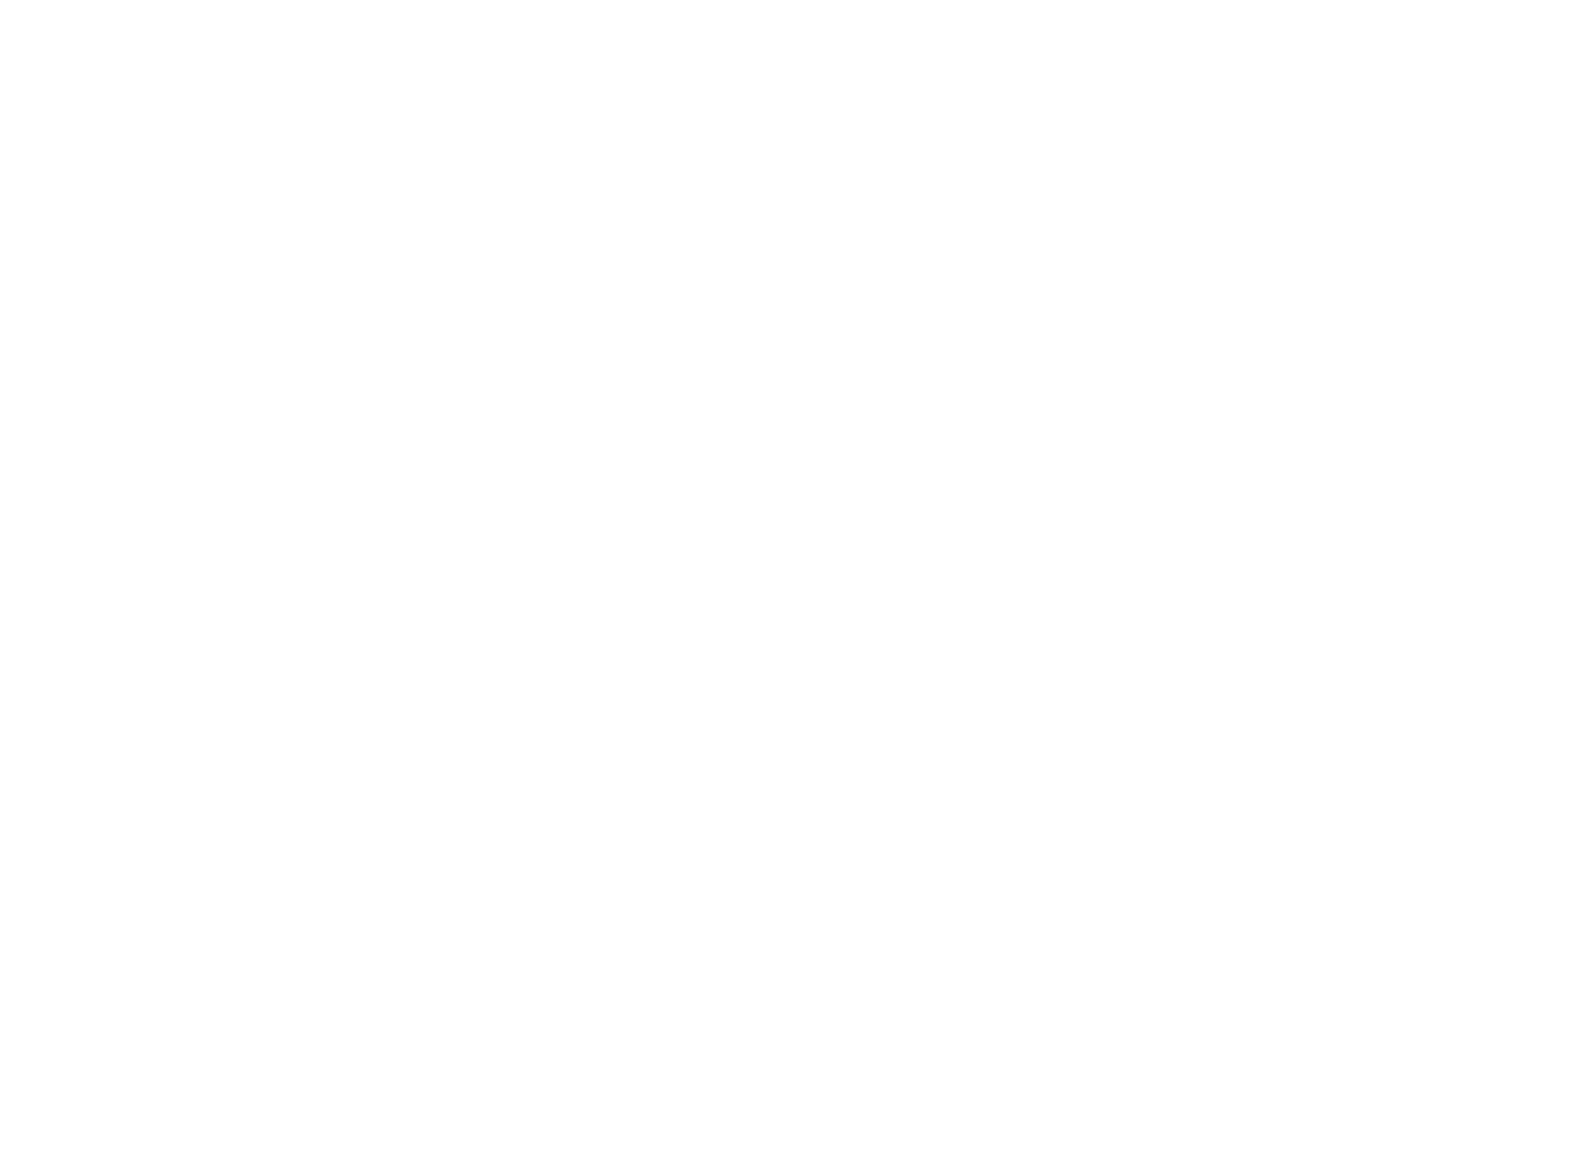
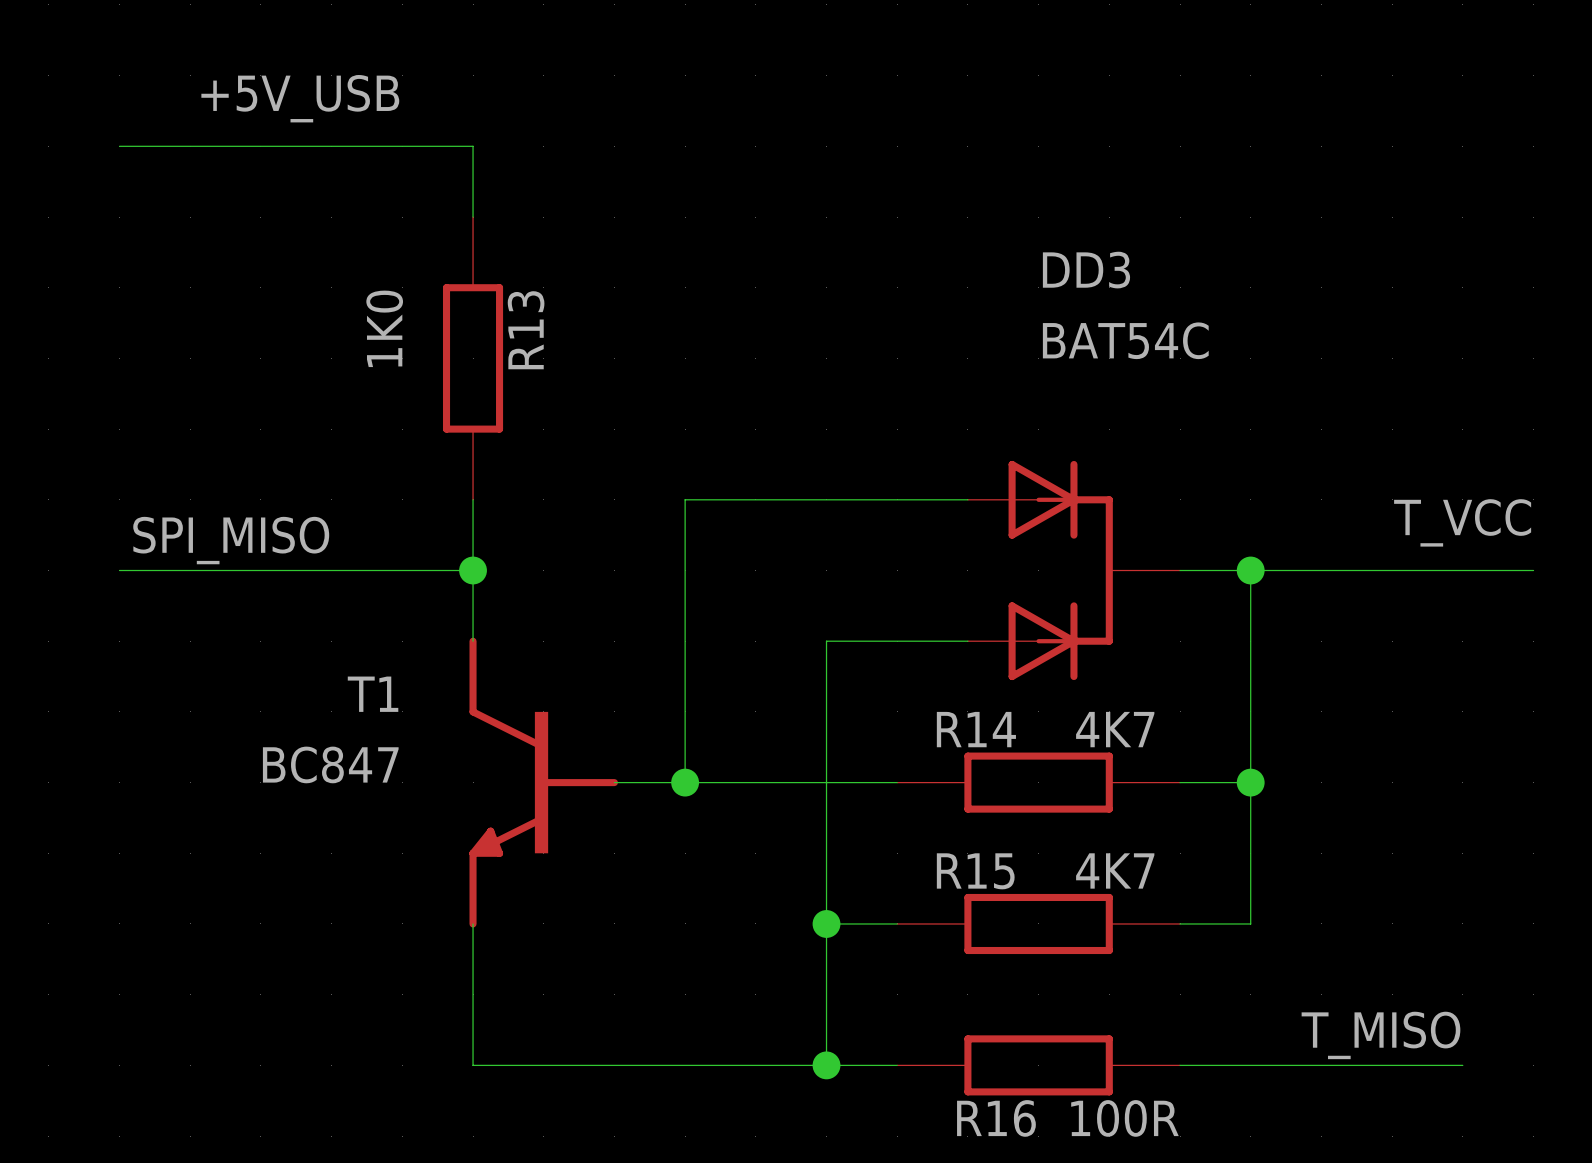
label: none -> +5V_USB (300, 98)
wire: none -> (119, 146) (473, 146) (473, 217)
R13: none -> 1K0 (473, 358)
wire: none -> (473, 499) (473, 641)
wire: none -> (967, 499) (685, 499) (685, 782)
label: none -> T_VCC (1462, 522)
label: none -> SPI_MISO (231, 540)
wire: none -> (119, 570) (473, 570)
junction: none -> (473, 570)
DD3: none -> BAT54C (1073, 570)
wire: none -> (1180, 570) (1533, 570)
wire: none -> (1250, 570) (1250, 923) (1180, 923)
junction: none -> (1250, 570)
wire: none -> (967, 641) (826, 641) (826, 1065)
T1: none -> BC847 (543, 782)
wire: none -> (614, 782) (897, 782)
junction: none -> (685, 782)
R14: none -> 4K7 (1038, 782)
wire: none -> (1180, 782) (1250, 782)
junction: none -> (1250, 782)
wire: none -> (473, 923) (473, 1065) (897, 1065)
wire: none -> (826, 923) (897, 923)
junction: none -> (826, 923)
R15: none -> 4K7 (1038, 923)
label: none -> T_MISO (1380, 1035)
junction: none -> (826, 1065)
R16: none -> 100R (1038, 1065)
wire: none -> (1180, 1065) (1462, 1065)

